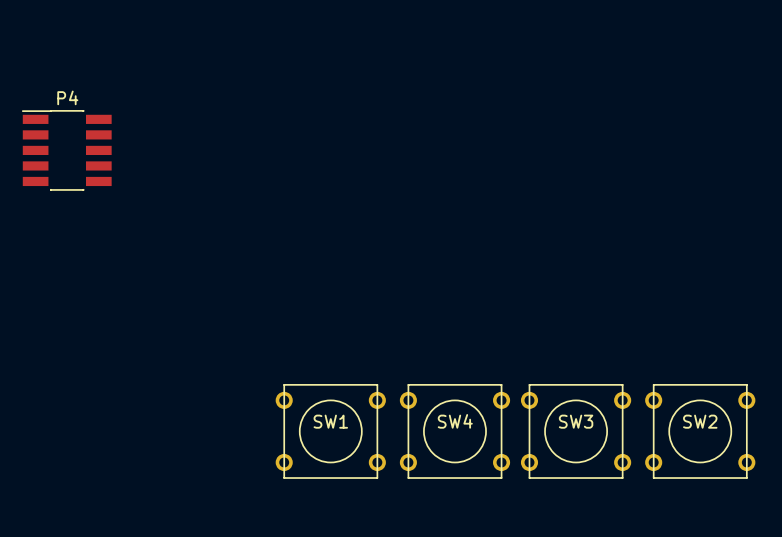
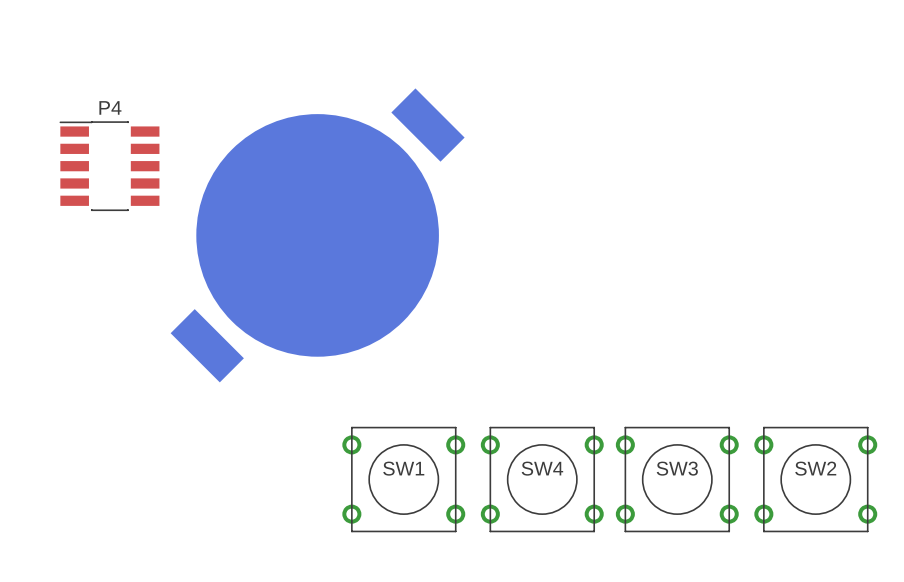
part: none -> (317, 235)

